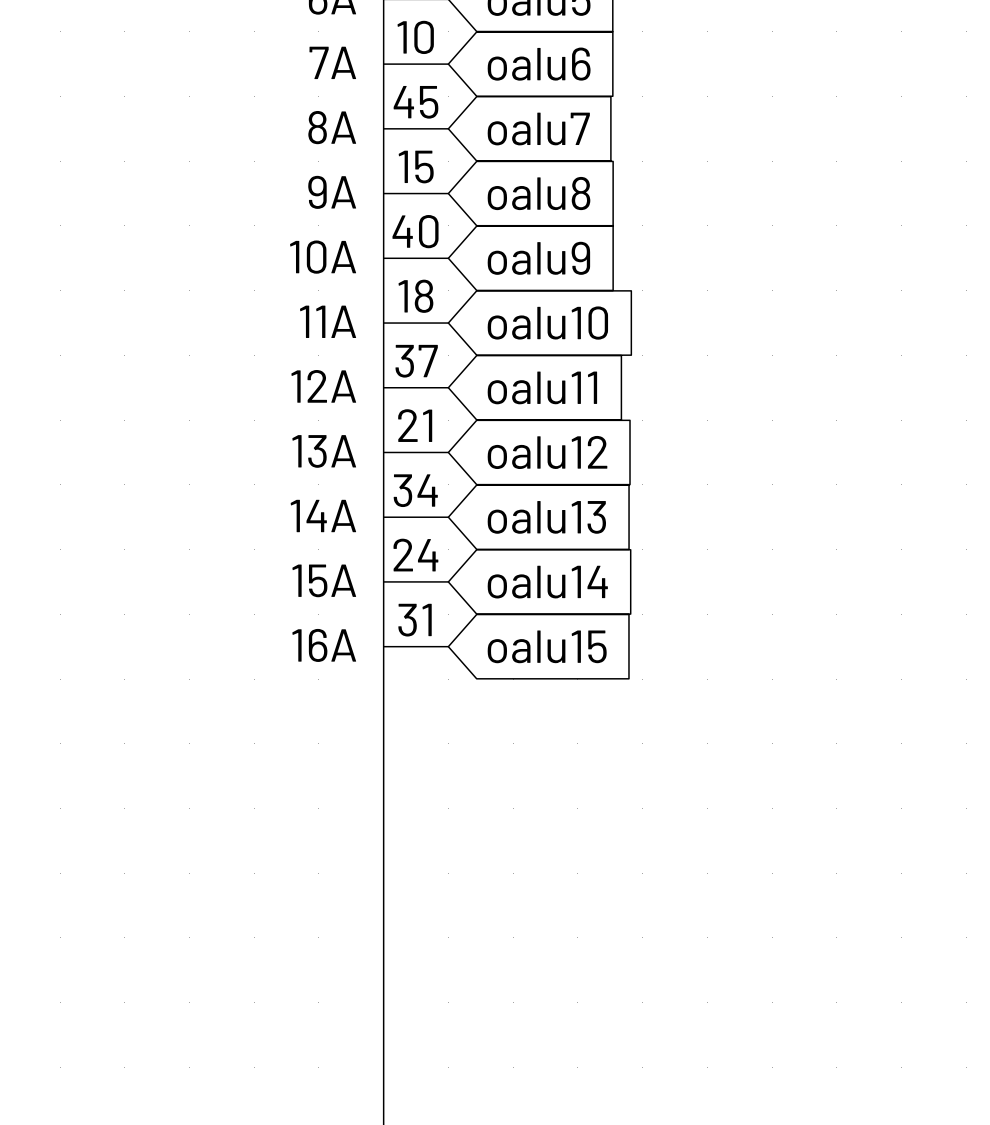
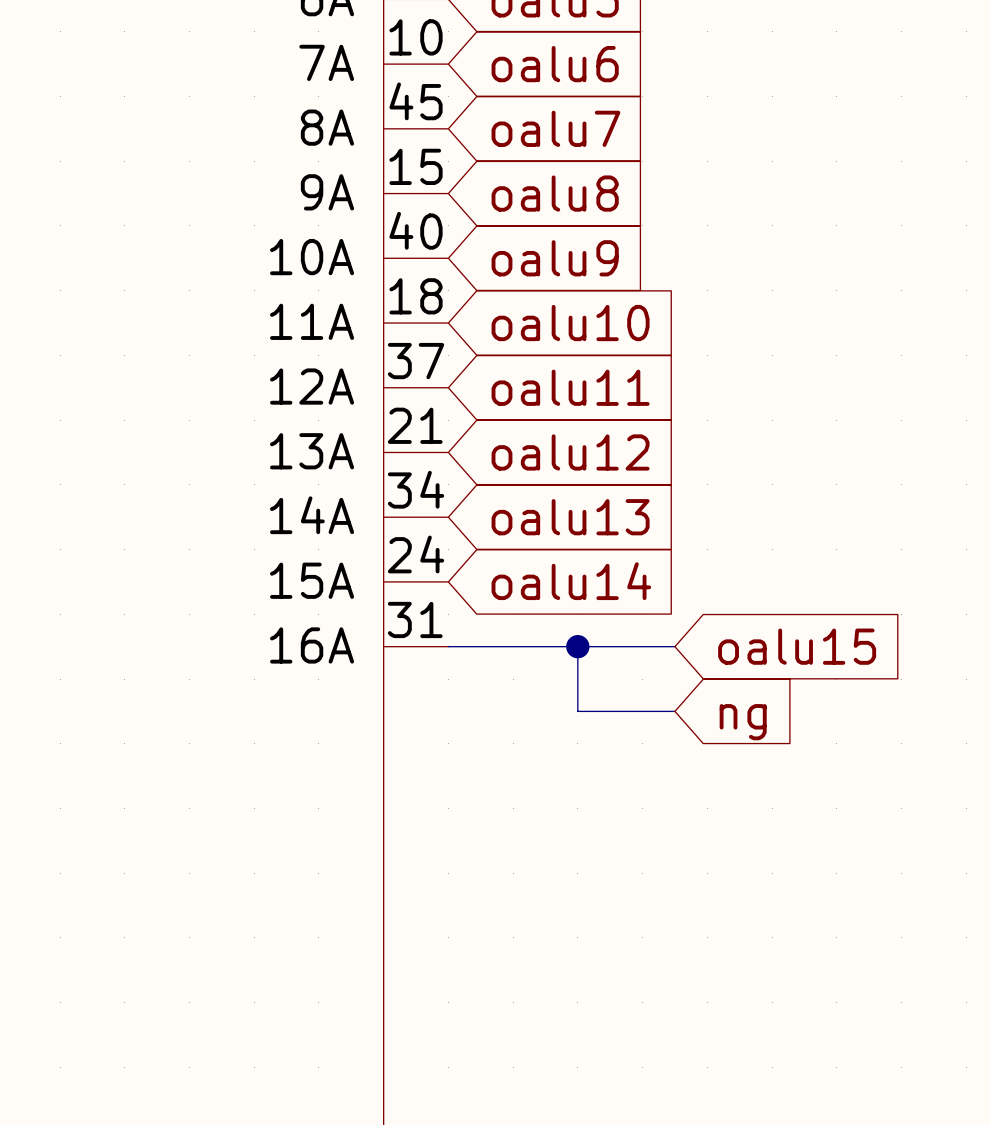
wire: none -> (448, 646) (674, 646)
global label position: oalu15 (547, 646) -> oalu15 (797, 646)
wire: none -> (577, 646) (577, 711) (674, 711)
junction: none -> (577, 646)
global label: none -> ng (743, 722)

